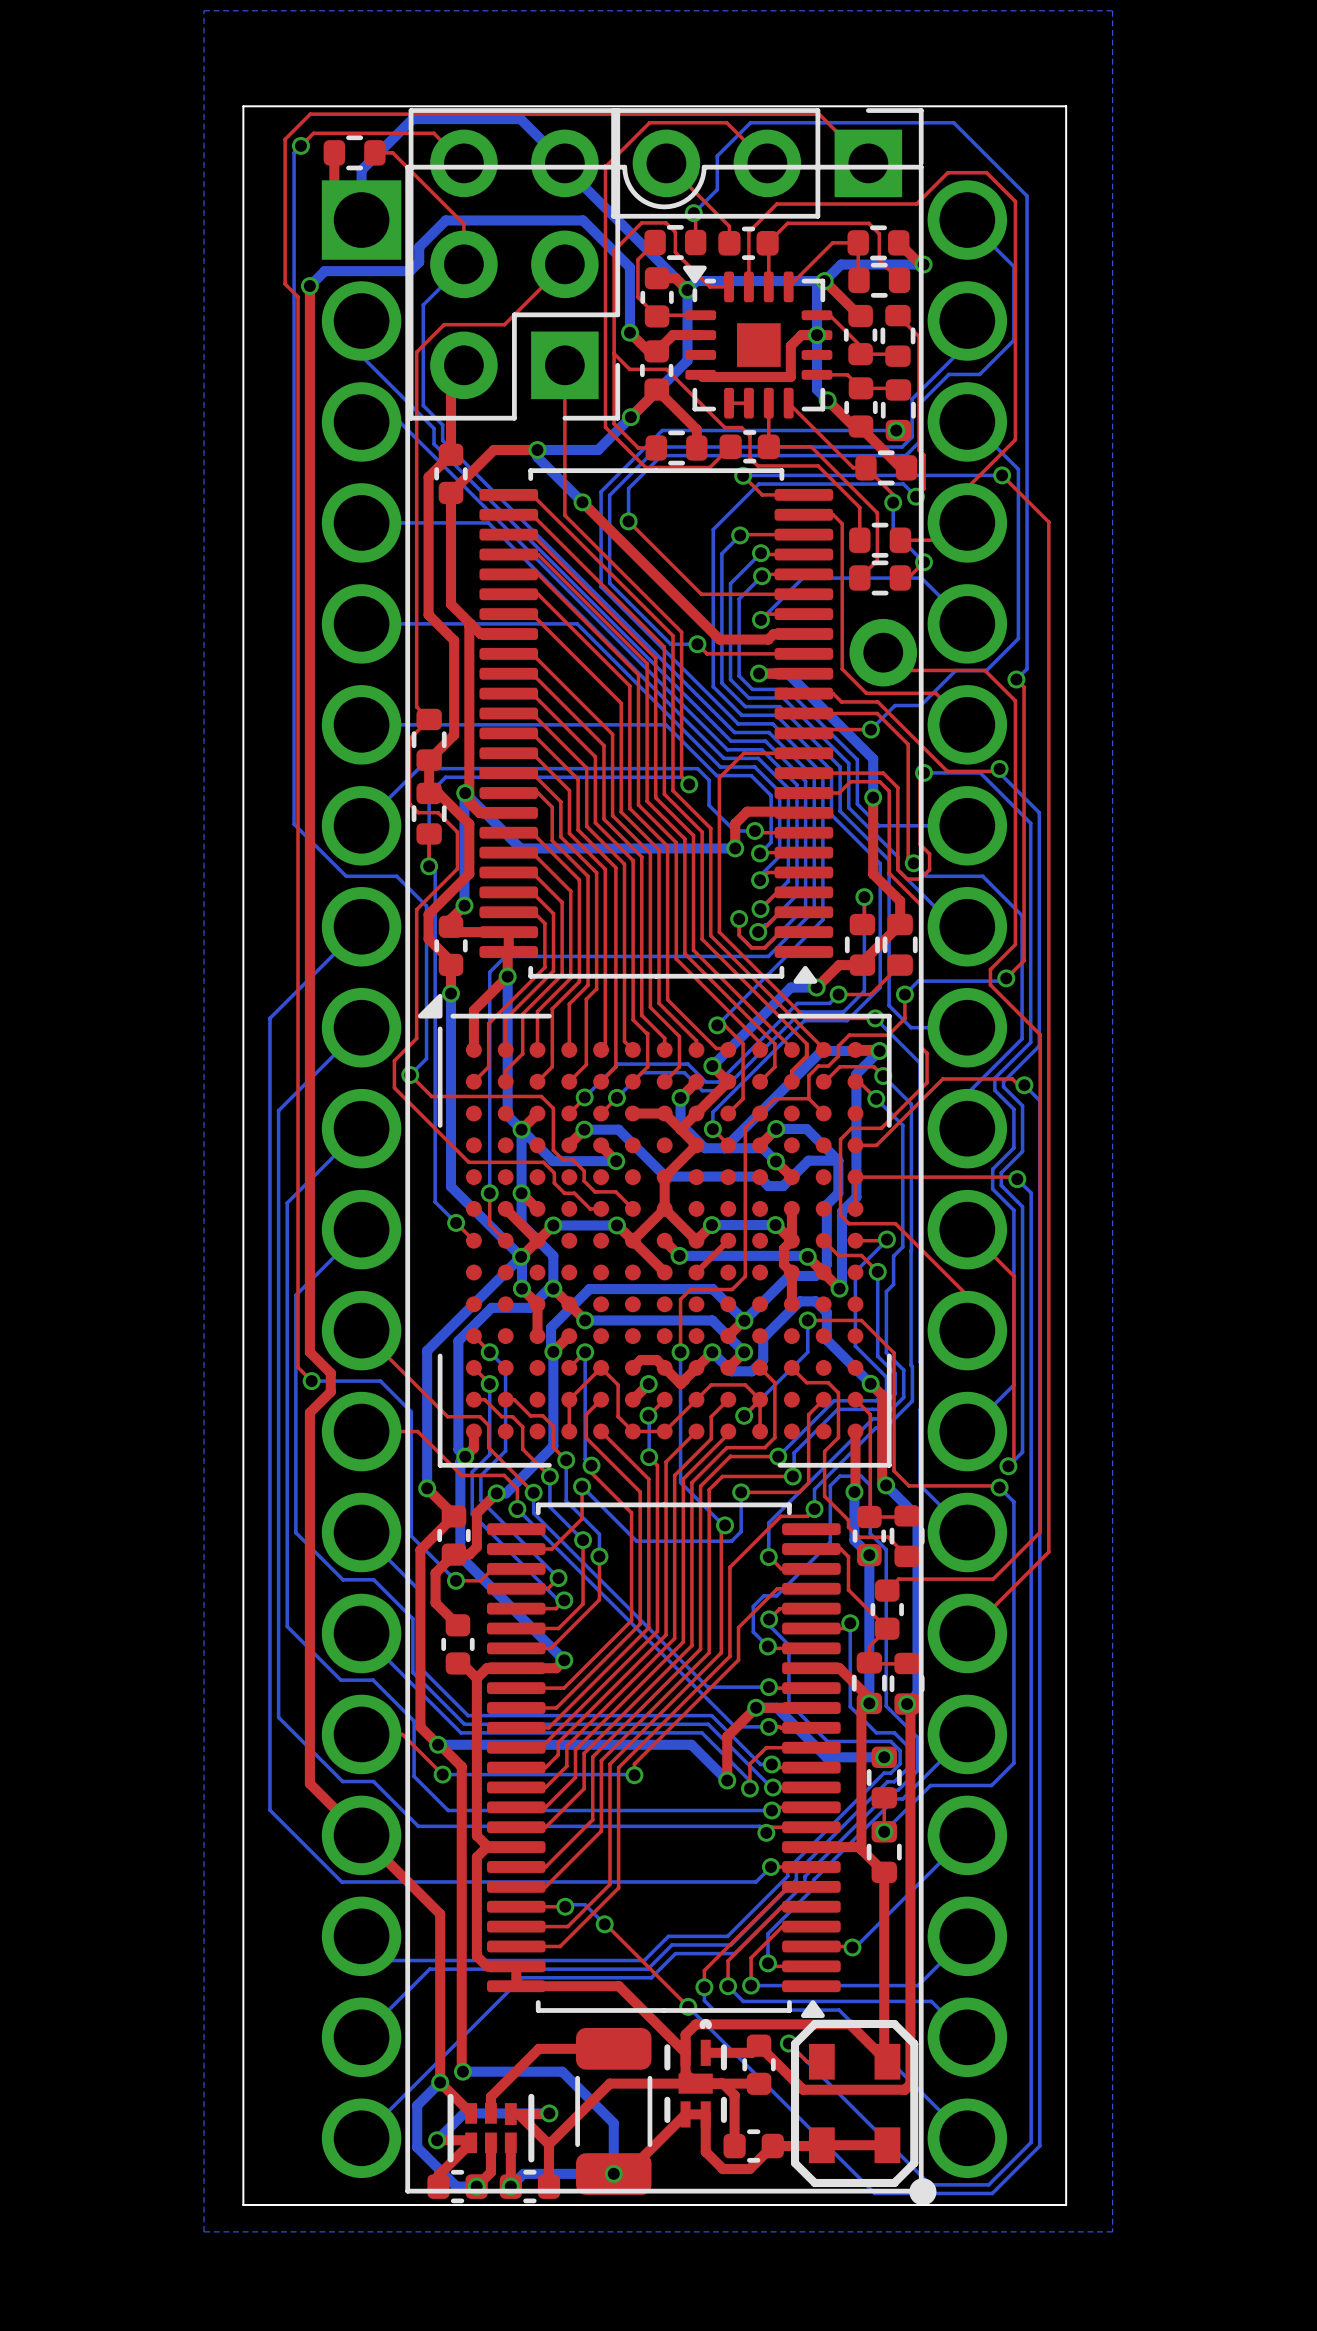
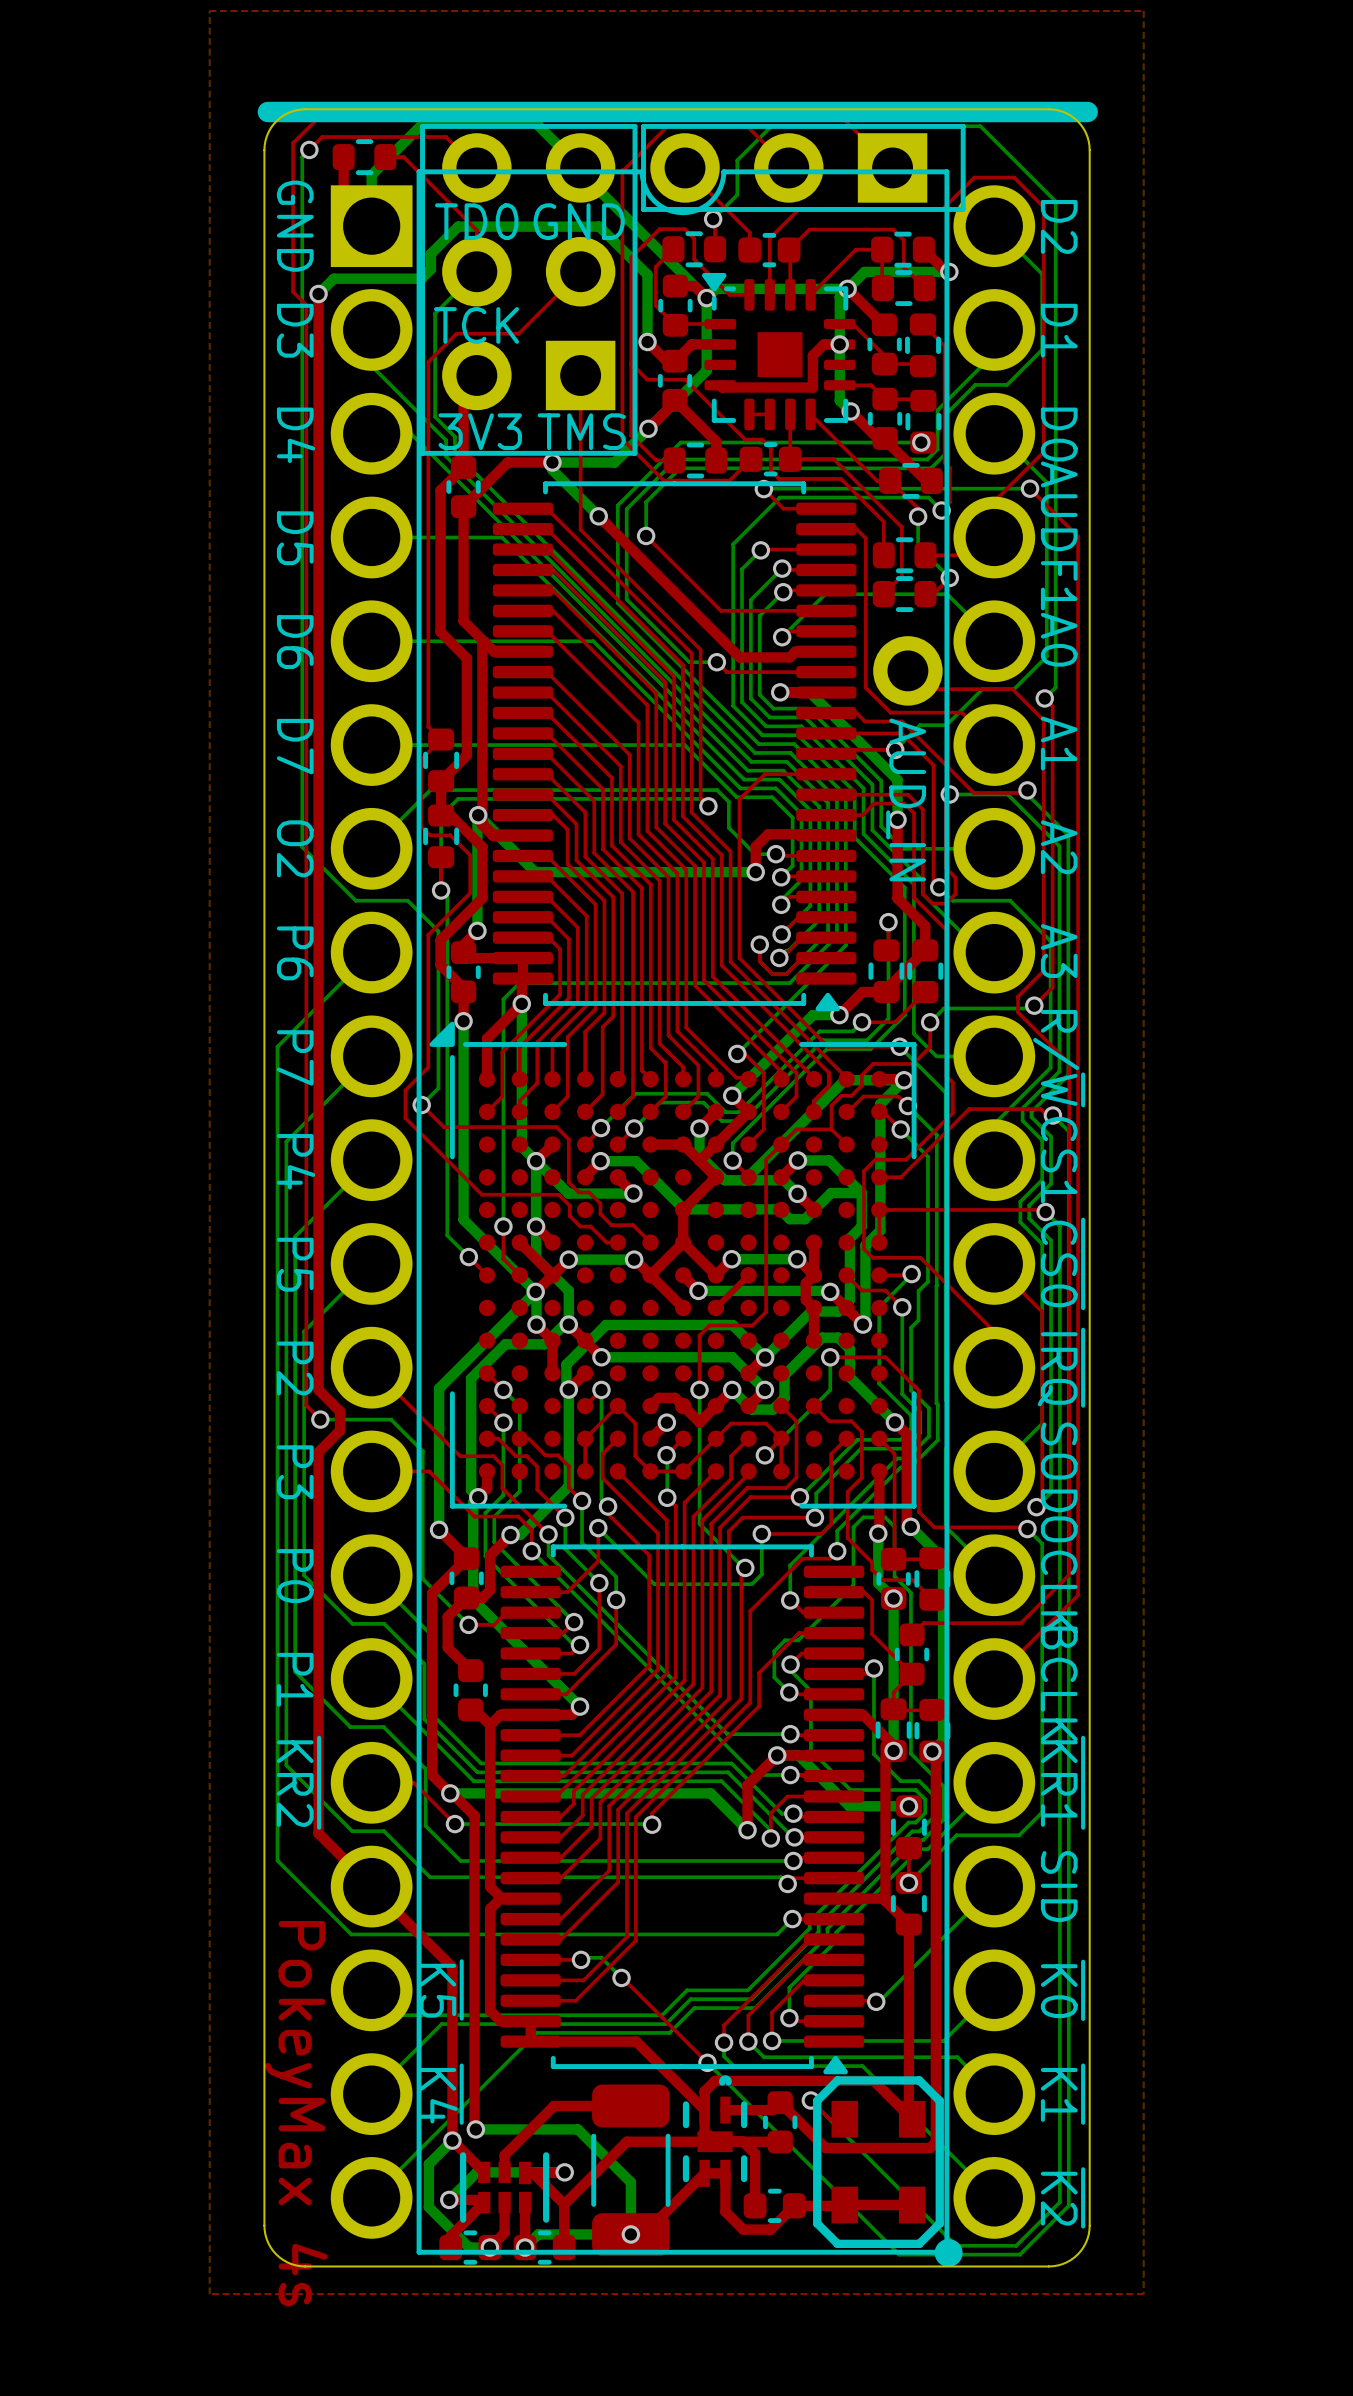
top zone outline: none -> (209, 11) (1143, 11) (1143, 2294) (209, 2294) (209, 11)
board edge: (296, 106) (243, 106) (243, 2204) (296, 2204) -> (305, 109) (291, 111) (276, 121) (268, 132) (264, 150) (264, 2225) (268, 2243) (276, 2254) (291, 2264) (305, 2266)
board edge: (1020, 106) (1066, 106) (1066, 2204) (1020, 2204) -> (1048, 109) (1062, 111) (1077, 121) (1087, 136) (1089, 150) (1089, 2225) (1087, 2239) (1077, 2254) (1062, 2264) (1048, 2266)
line: none -> (267, 112) (1087, 112)
part footprint: [408, 108, 621, 421] -> [420, 123, 638, 456]
part footprint: [611, 108, 924, 219] -> [641, 123, 966, 212]
text: none -> TD0 (476, 221)
text: none -> GND (579, 221)
text: none -> GND (295, 226)
text: none -> D2 (1059, 226)
text: none -> TCK (476, 325)
text: none -> D3 (295, 330)
text: none -> D1 (1059, 330)
text: none -> TMS (581, 431)
text: none -> 3V3 (480, 431)
text: none -> D4 (296, 435)
text: none -> D0 (1059, 434)
text: none -> AUDF1 (1059, 535)
text: none -> D5 (295, 538)
text: none -> A0 (1059, 639)
text: none -> D6 (295, 642)
text: none -> A1 (1059, 743)
text: none -> D7 (295, 746)
text: none -> AUD_IN (906, 799)
text: none -> A2 (1059, 847)
text: none -> O2 (295, 848)
text: none -> A3 (1059, 951)
text: none -> P6 (295, 953)
text: none -> P7 (295, 1057)
text: none -> R/~{W} (1059, 1058)
text: none -> CS1 (1059, 1160)
text: none -> P4 (296, 1161)
text: none -> ~{CS0} (1063, 1263)
text: none -> P5 (295, 1264)
text: none -> ~{IRQ} (1061, 1367)
text: none -> P2 (295, 1368)
text: none -> SOD (1059, 1467)
text: none -> P3 (295, 1472)
text: none -> P0 (295, 1576)
text: none -> OCLK (1059, 1575)
text: none -> P1 (295, 1679)
text: none -> BCLK (1059, 1683)
text: none -> ~{KR2} (299, 1782)
text: none -> ~{KR1} (1063, 1782)
text: none -> SID (1059, 1886)
text: none -> ~{K5} (441, 1989)
text: none -> ~{K0} (1063, 1990)
text: none -> PokeyMax 4s (296, 2113)
text: none -> ~{K4} (441, 2094)
text: none -> ~{K1} (1063, 2094)
text: none -> ~{K2} (1063, 2197)

